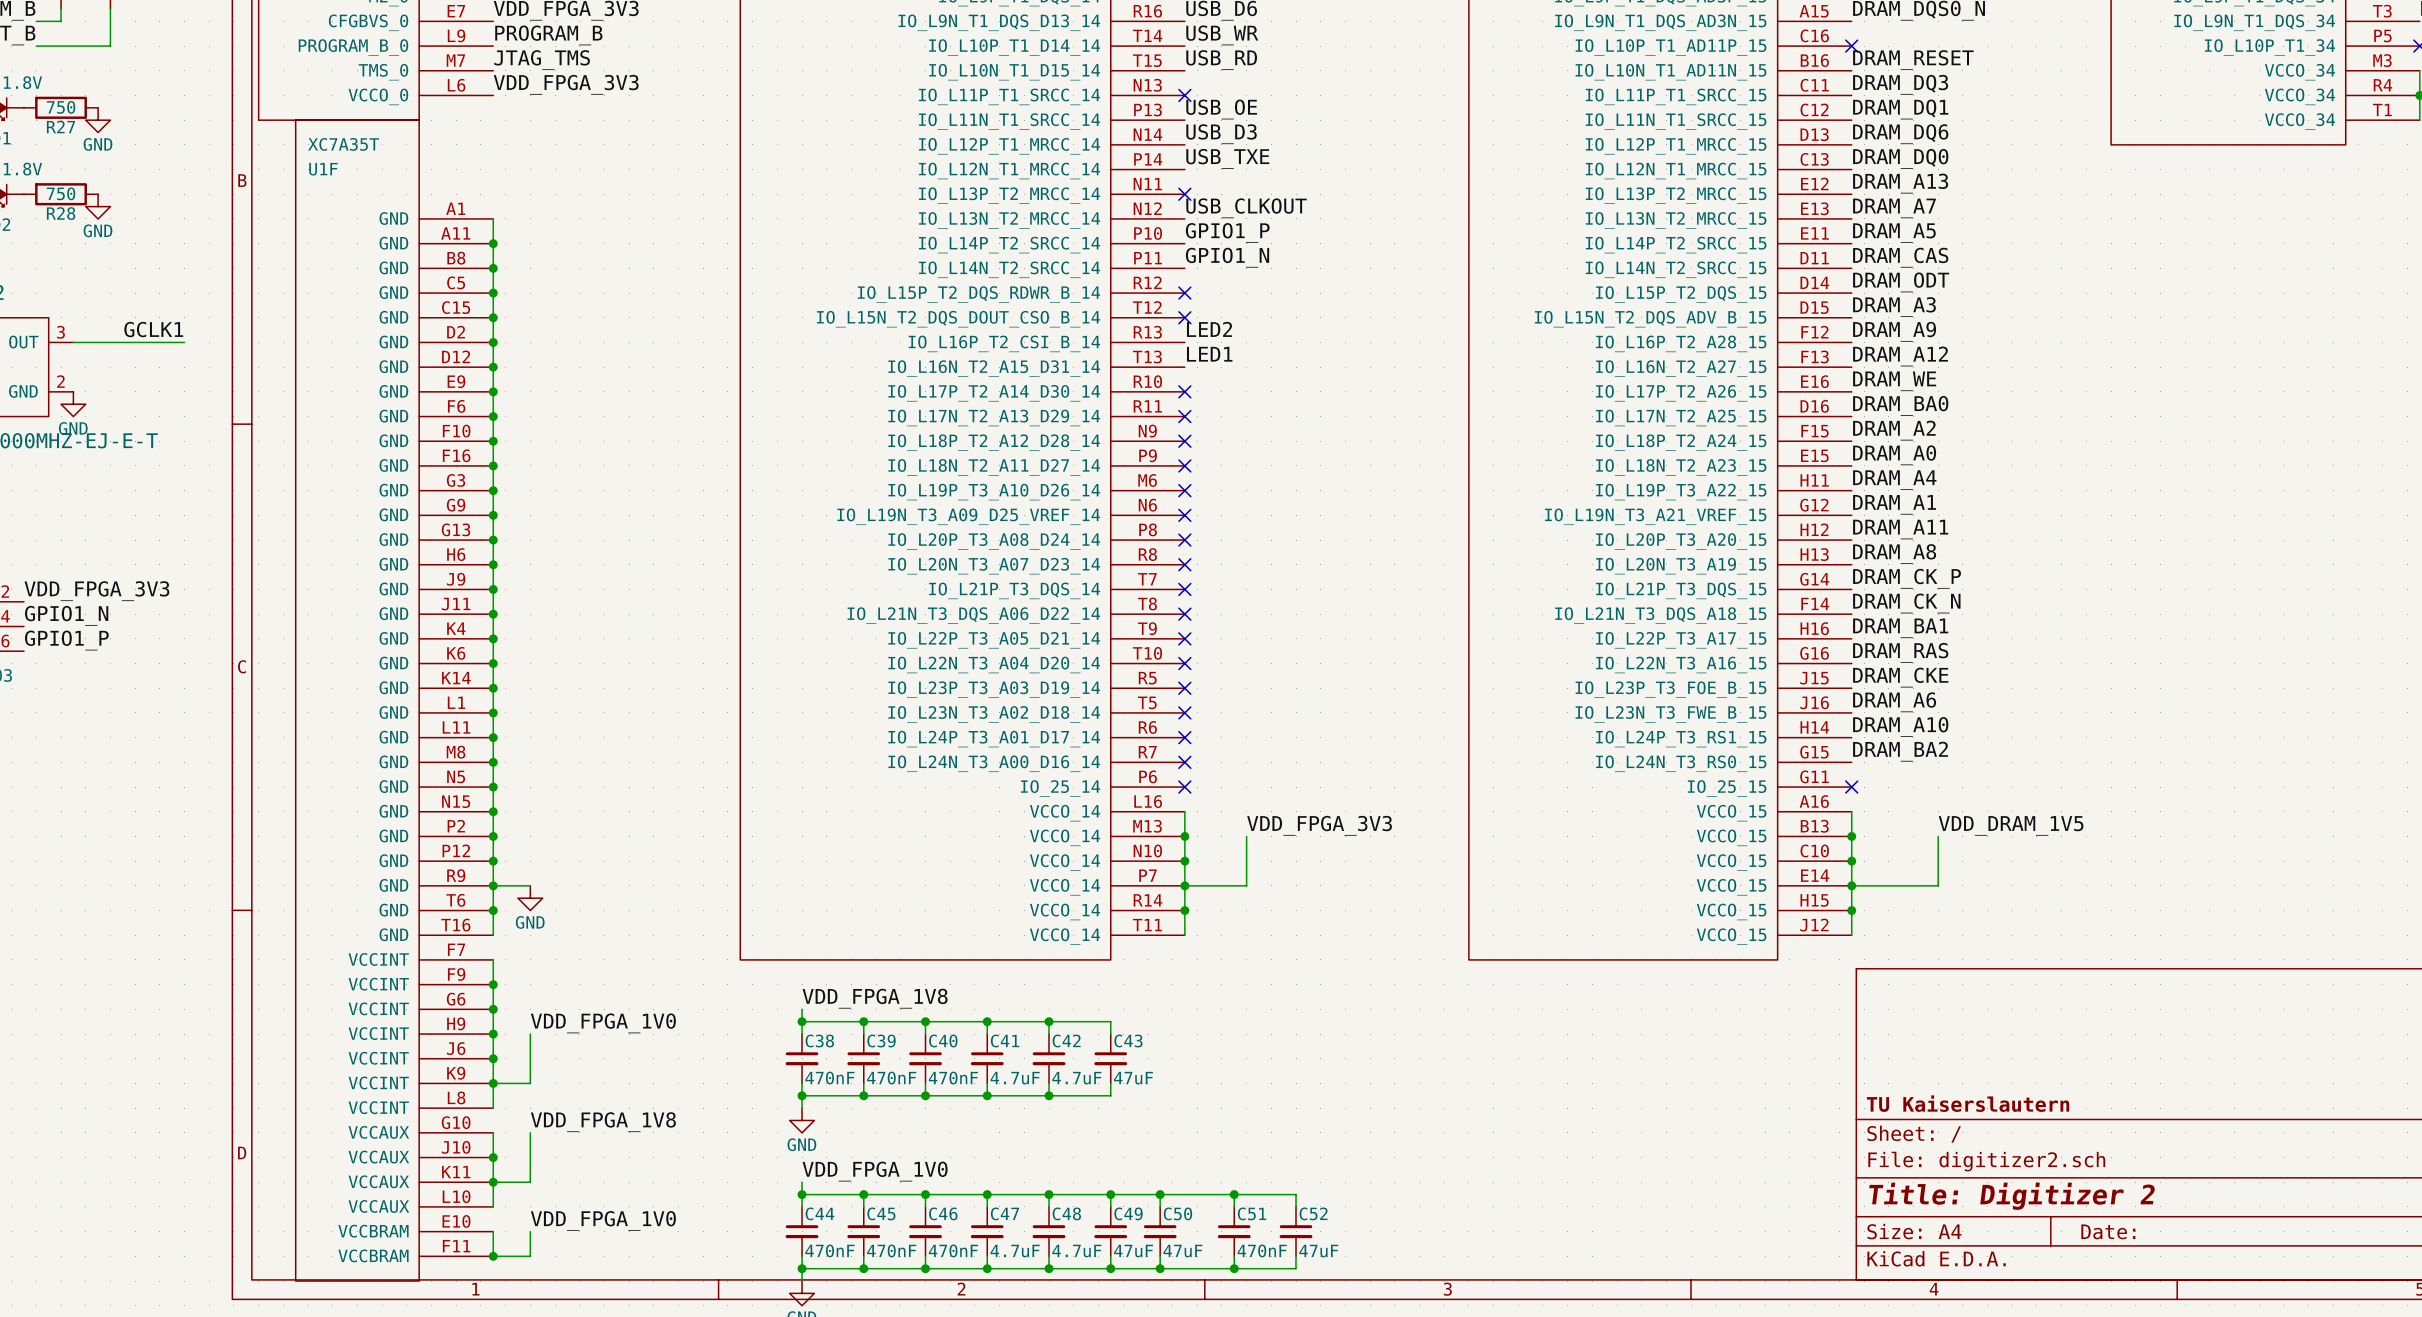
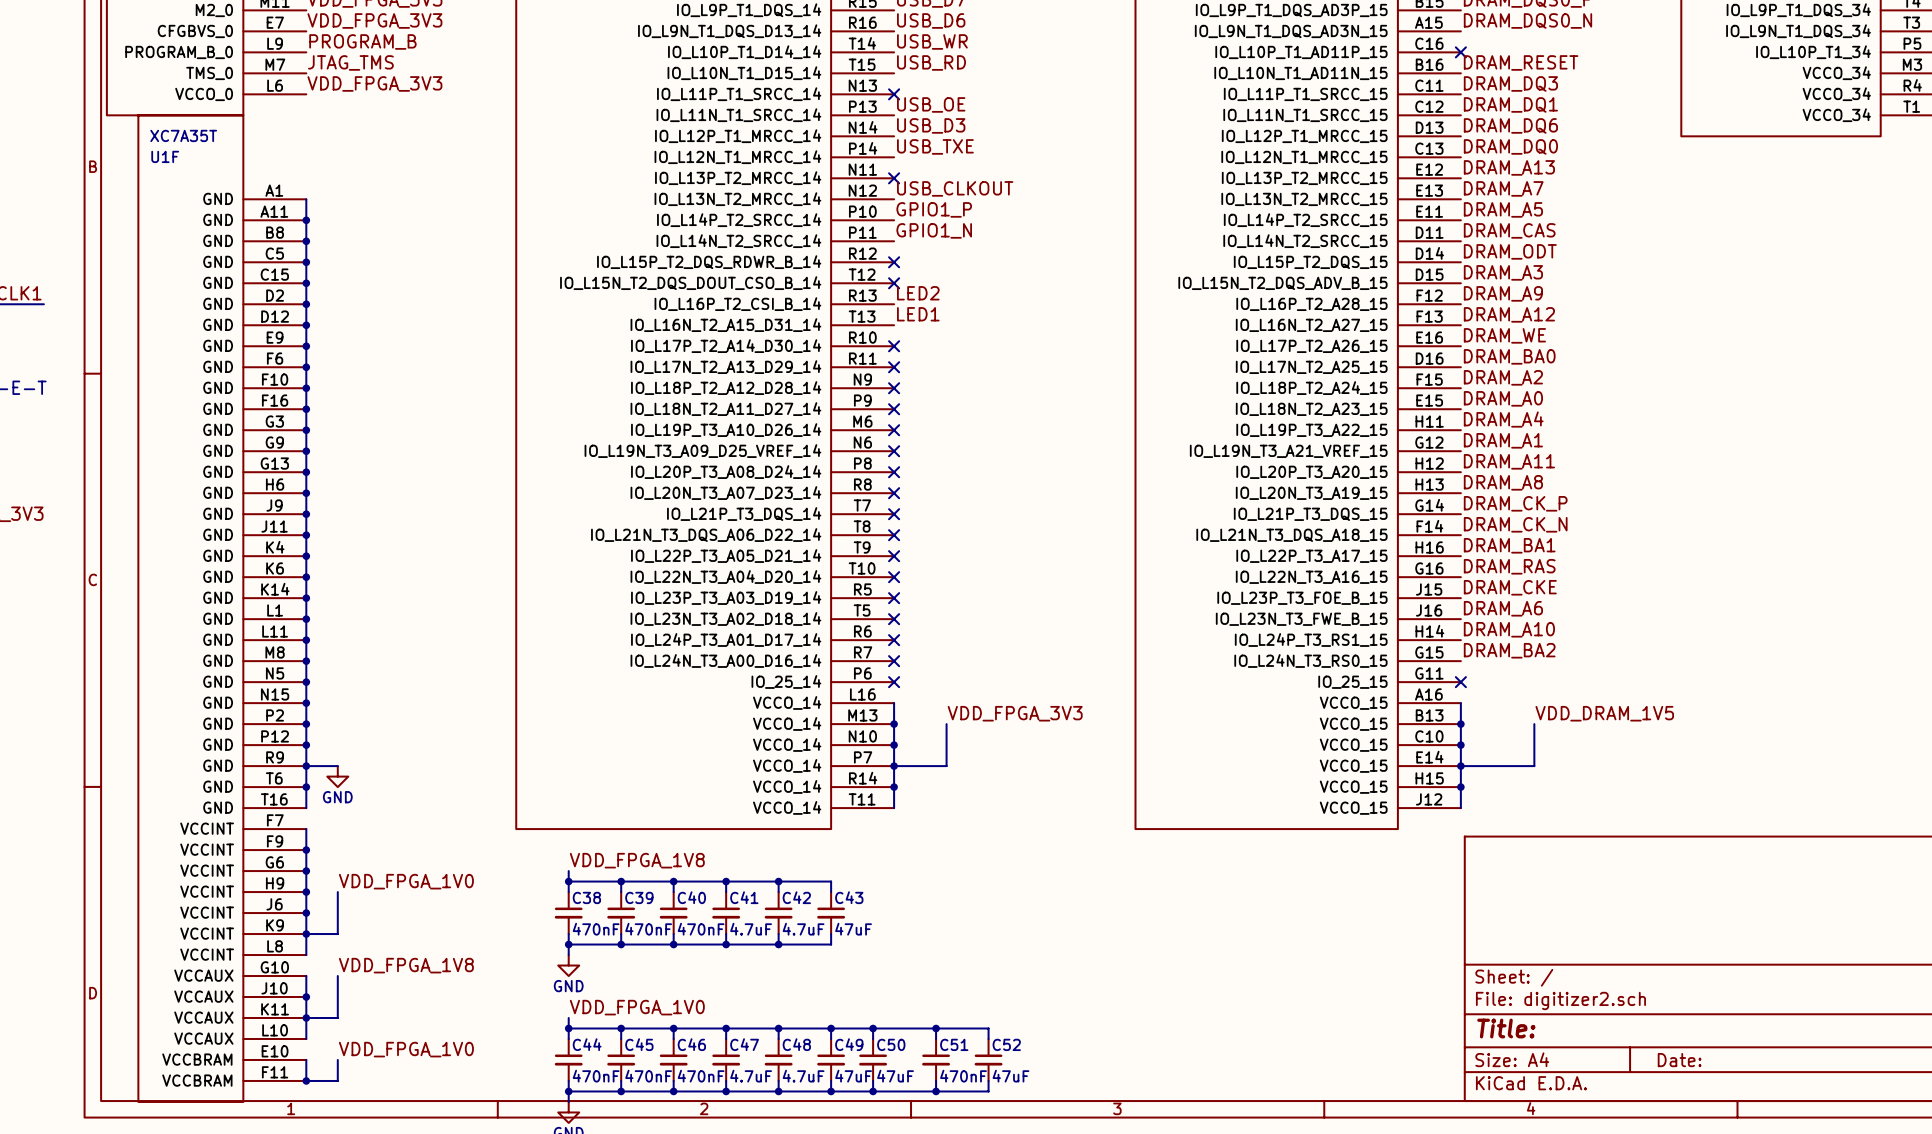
title block: TU Kaiserslautern (1968, 1103) -> none
title block: Title: Digitizer 2 (2012, 1196) -> Title: (1506, 1028)

